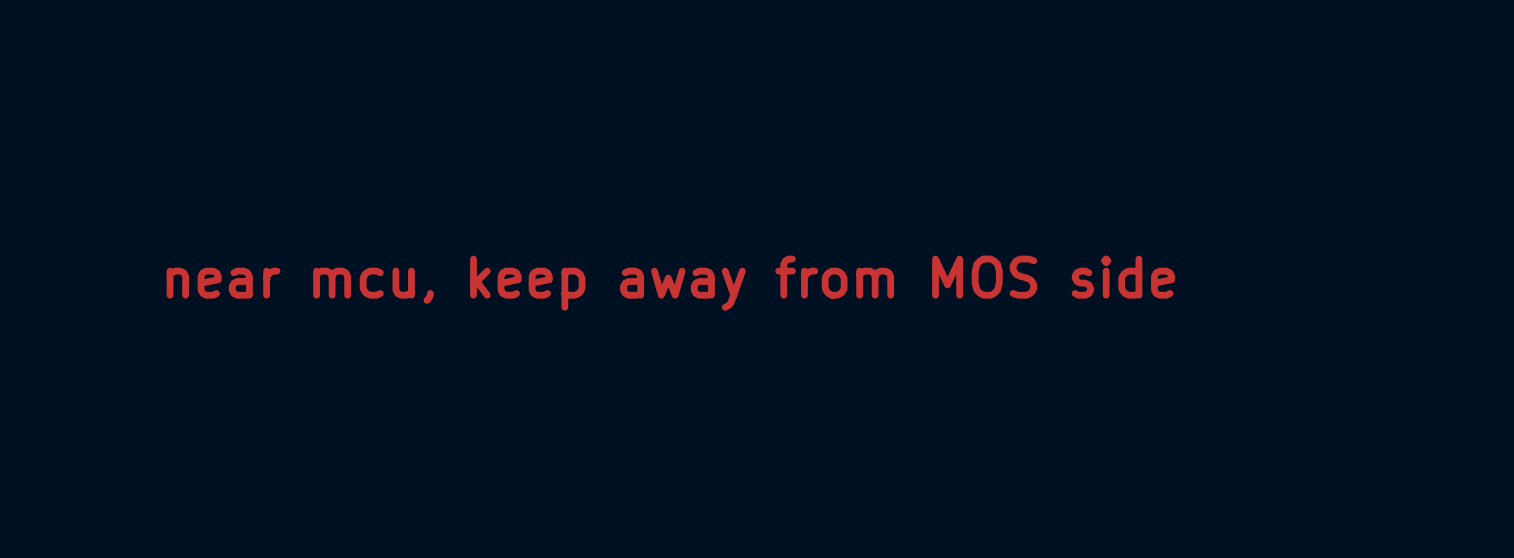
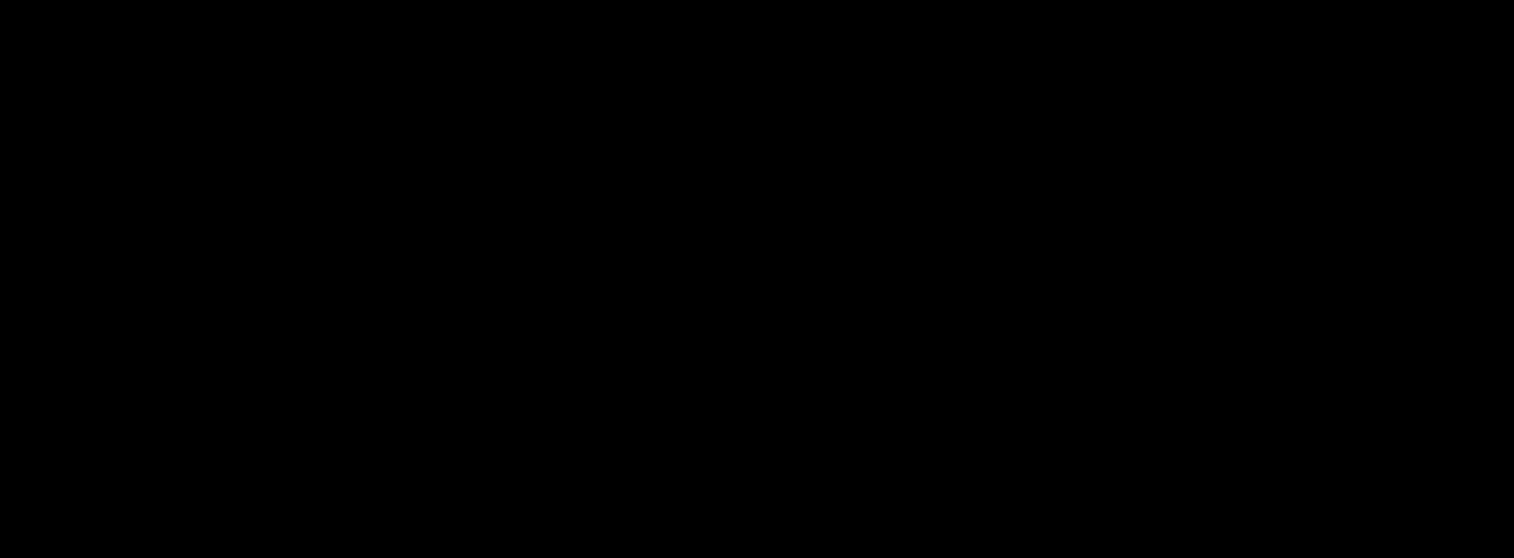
text: near mcu, keep away from MOS side (670, 283) -> none

